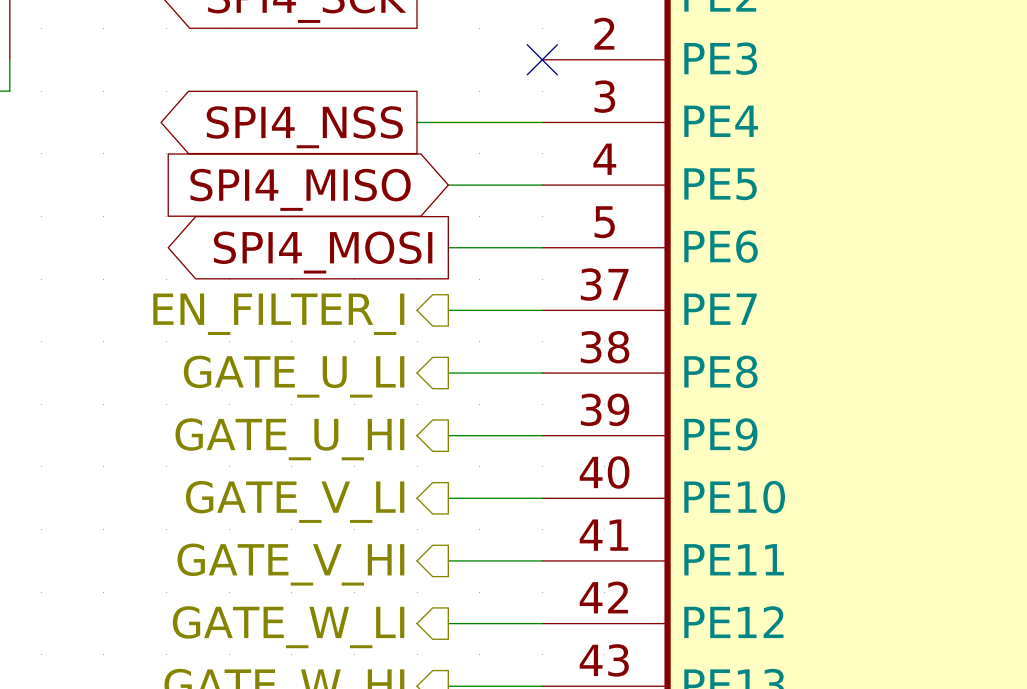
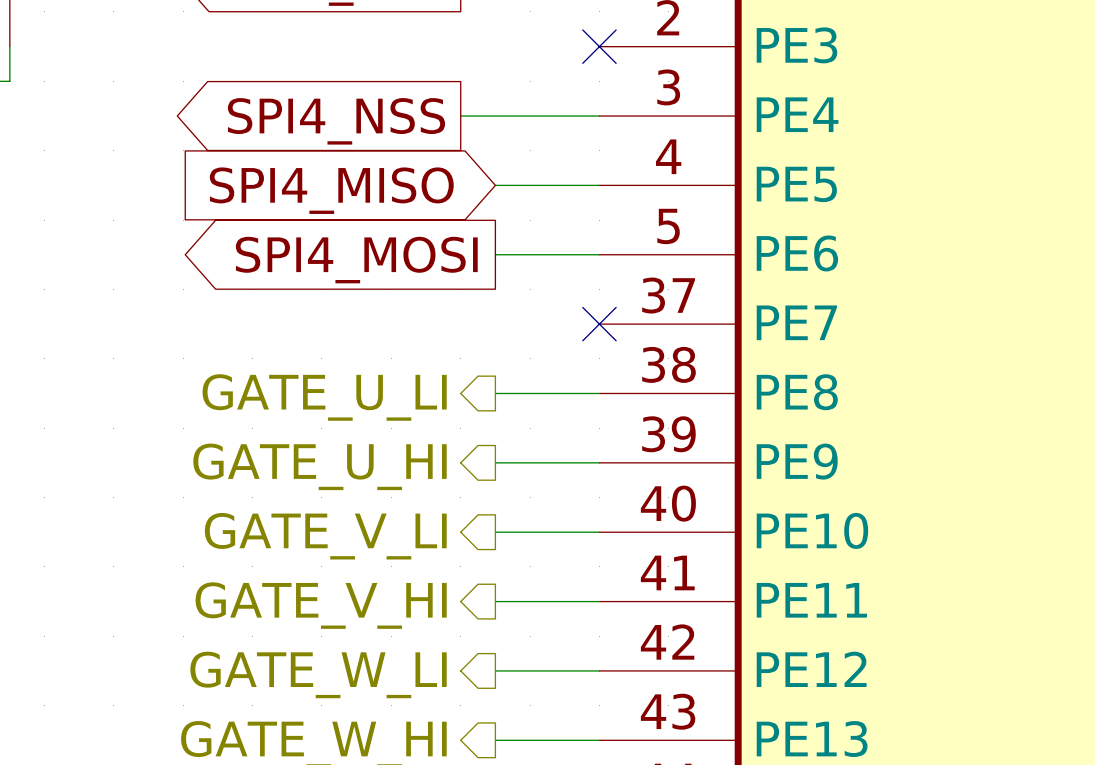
wire: (448, 310) (542, 310) -> none
no-connect mark: none -> (599, 324)
hierarchical label: EN_FILTER_I (278, 314) -> none

